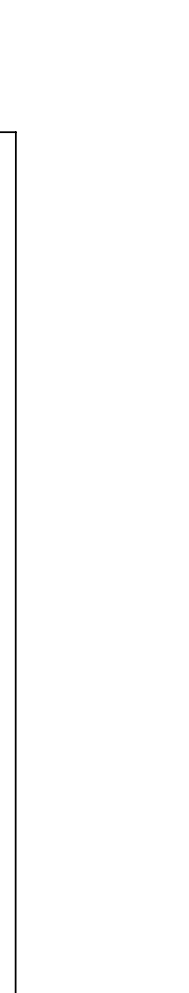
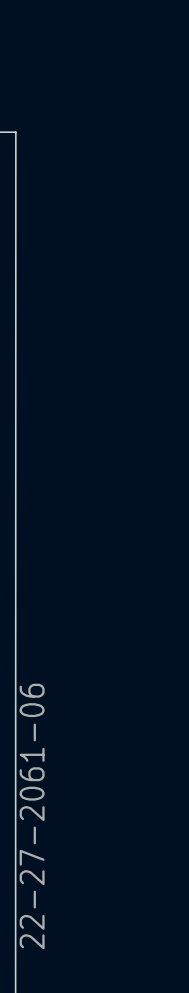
part value: none -> 22-27-2061-06 (32, 816)

